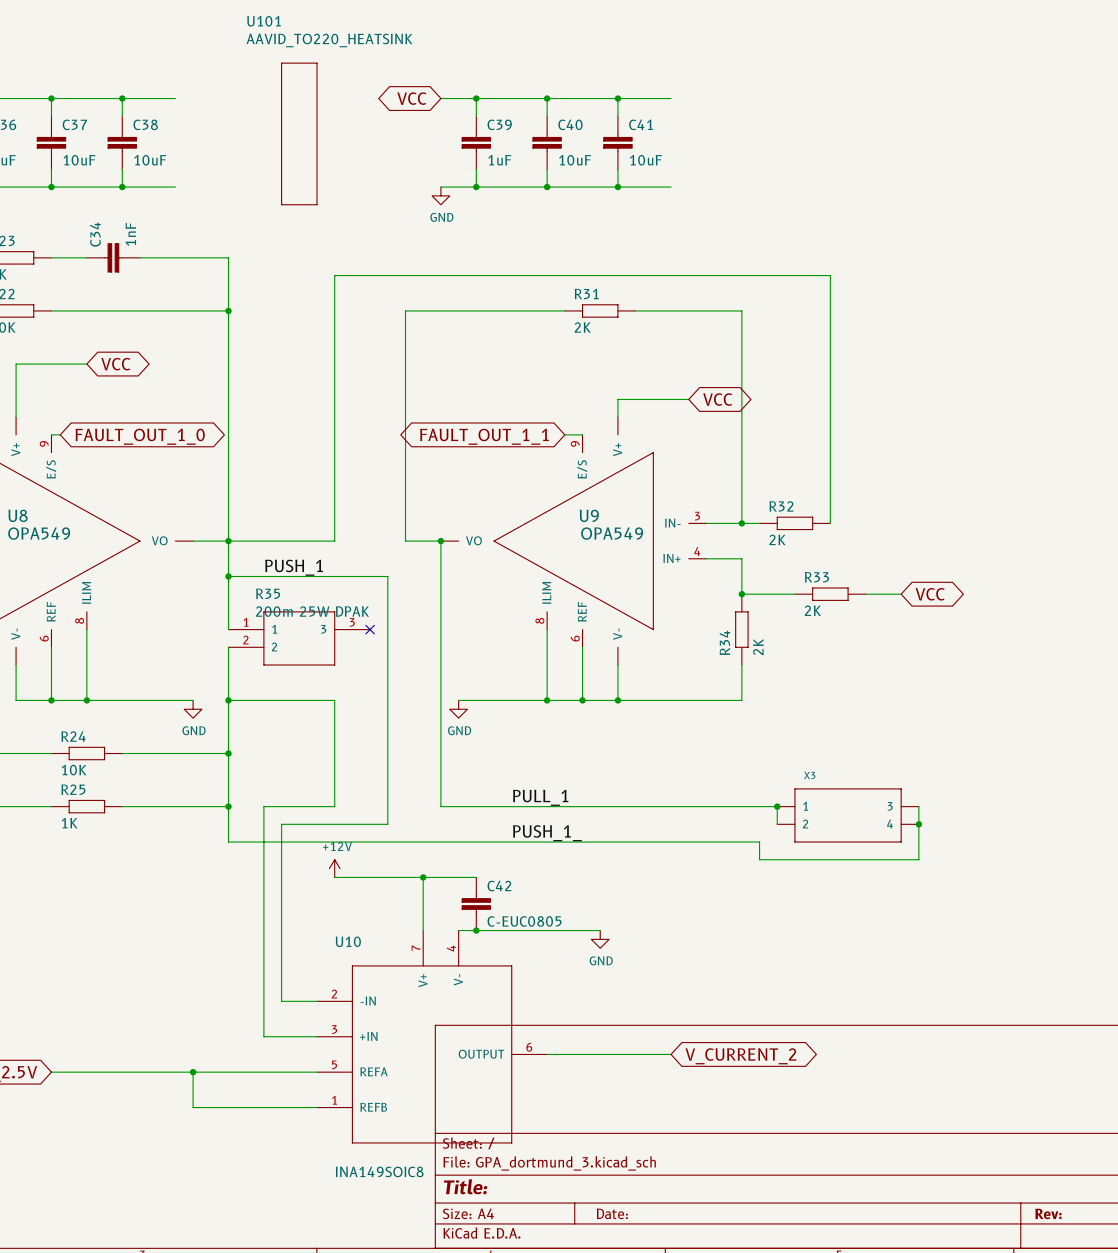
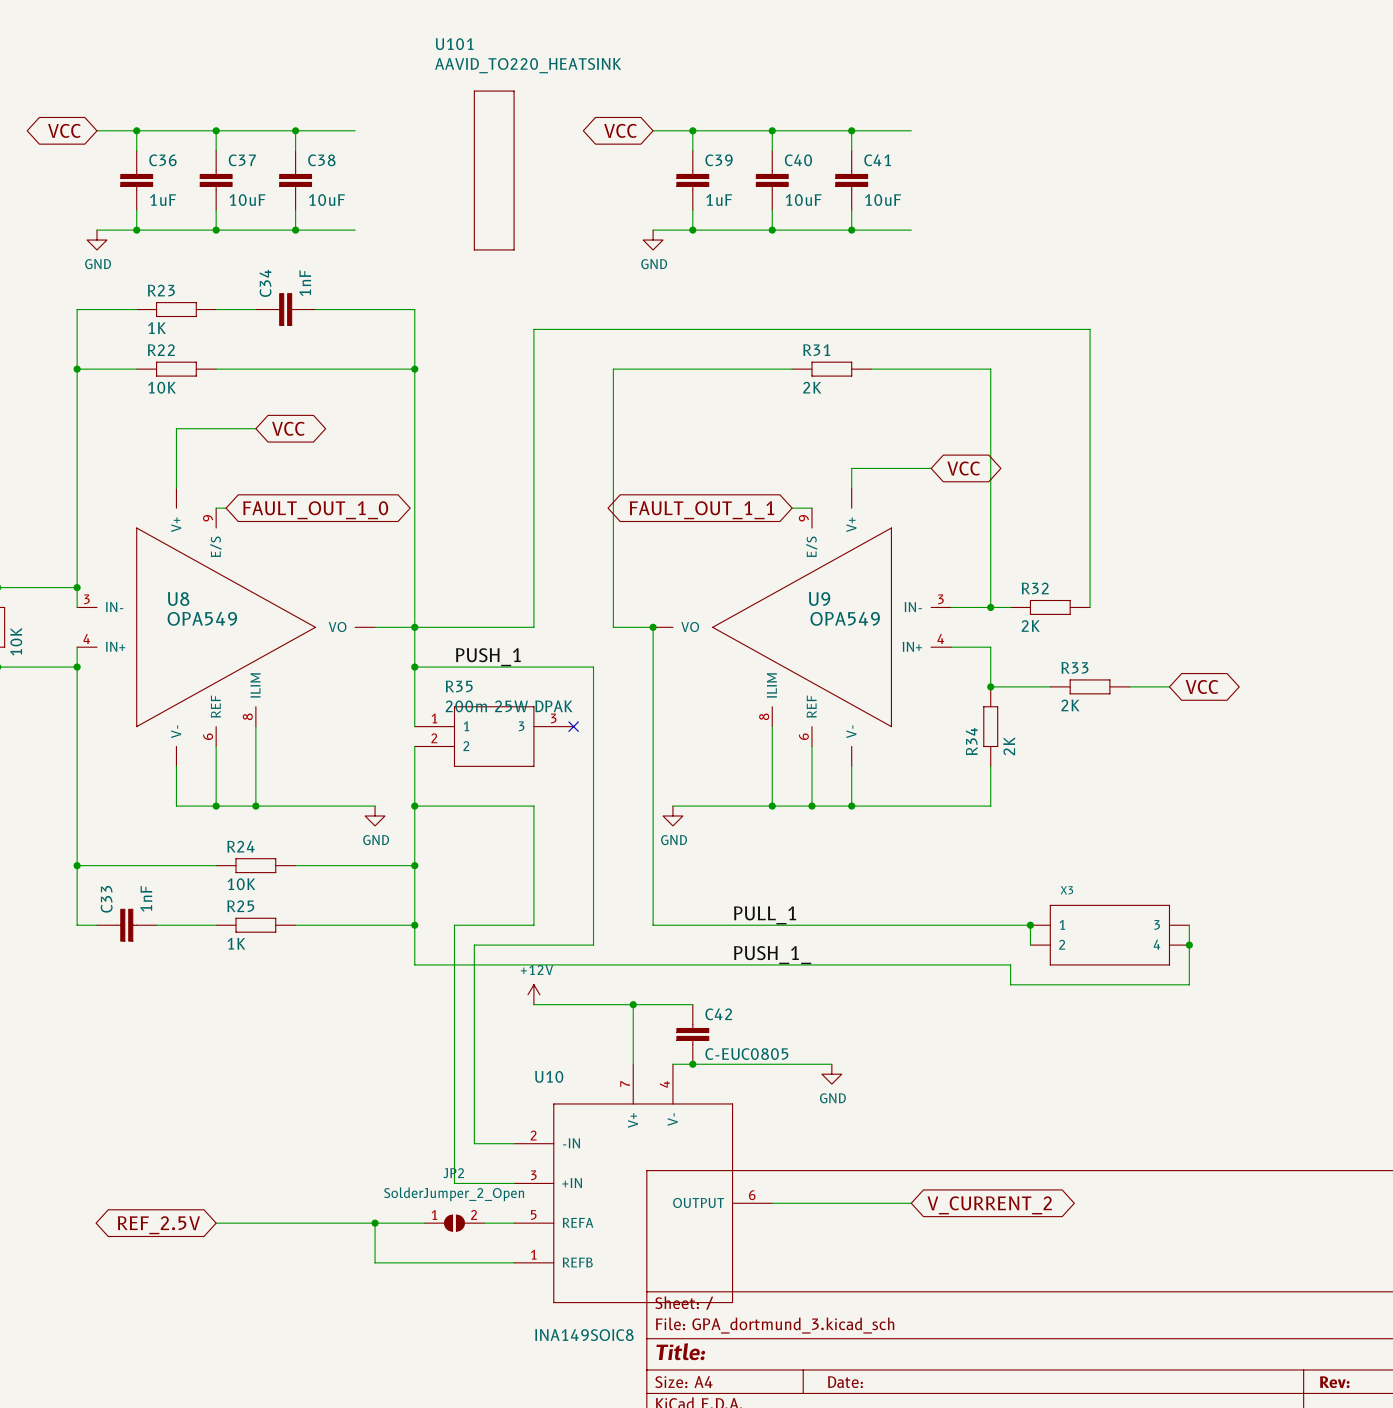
JP2: none -> SolderJumper_2_Open (454, 1223)

